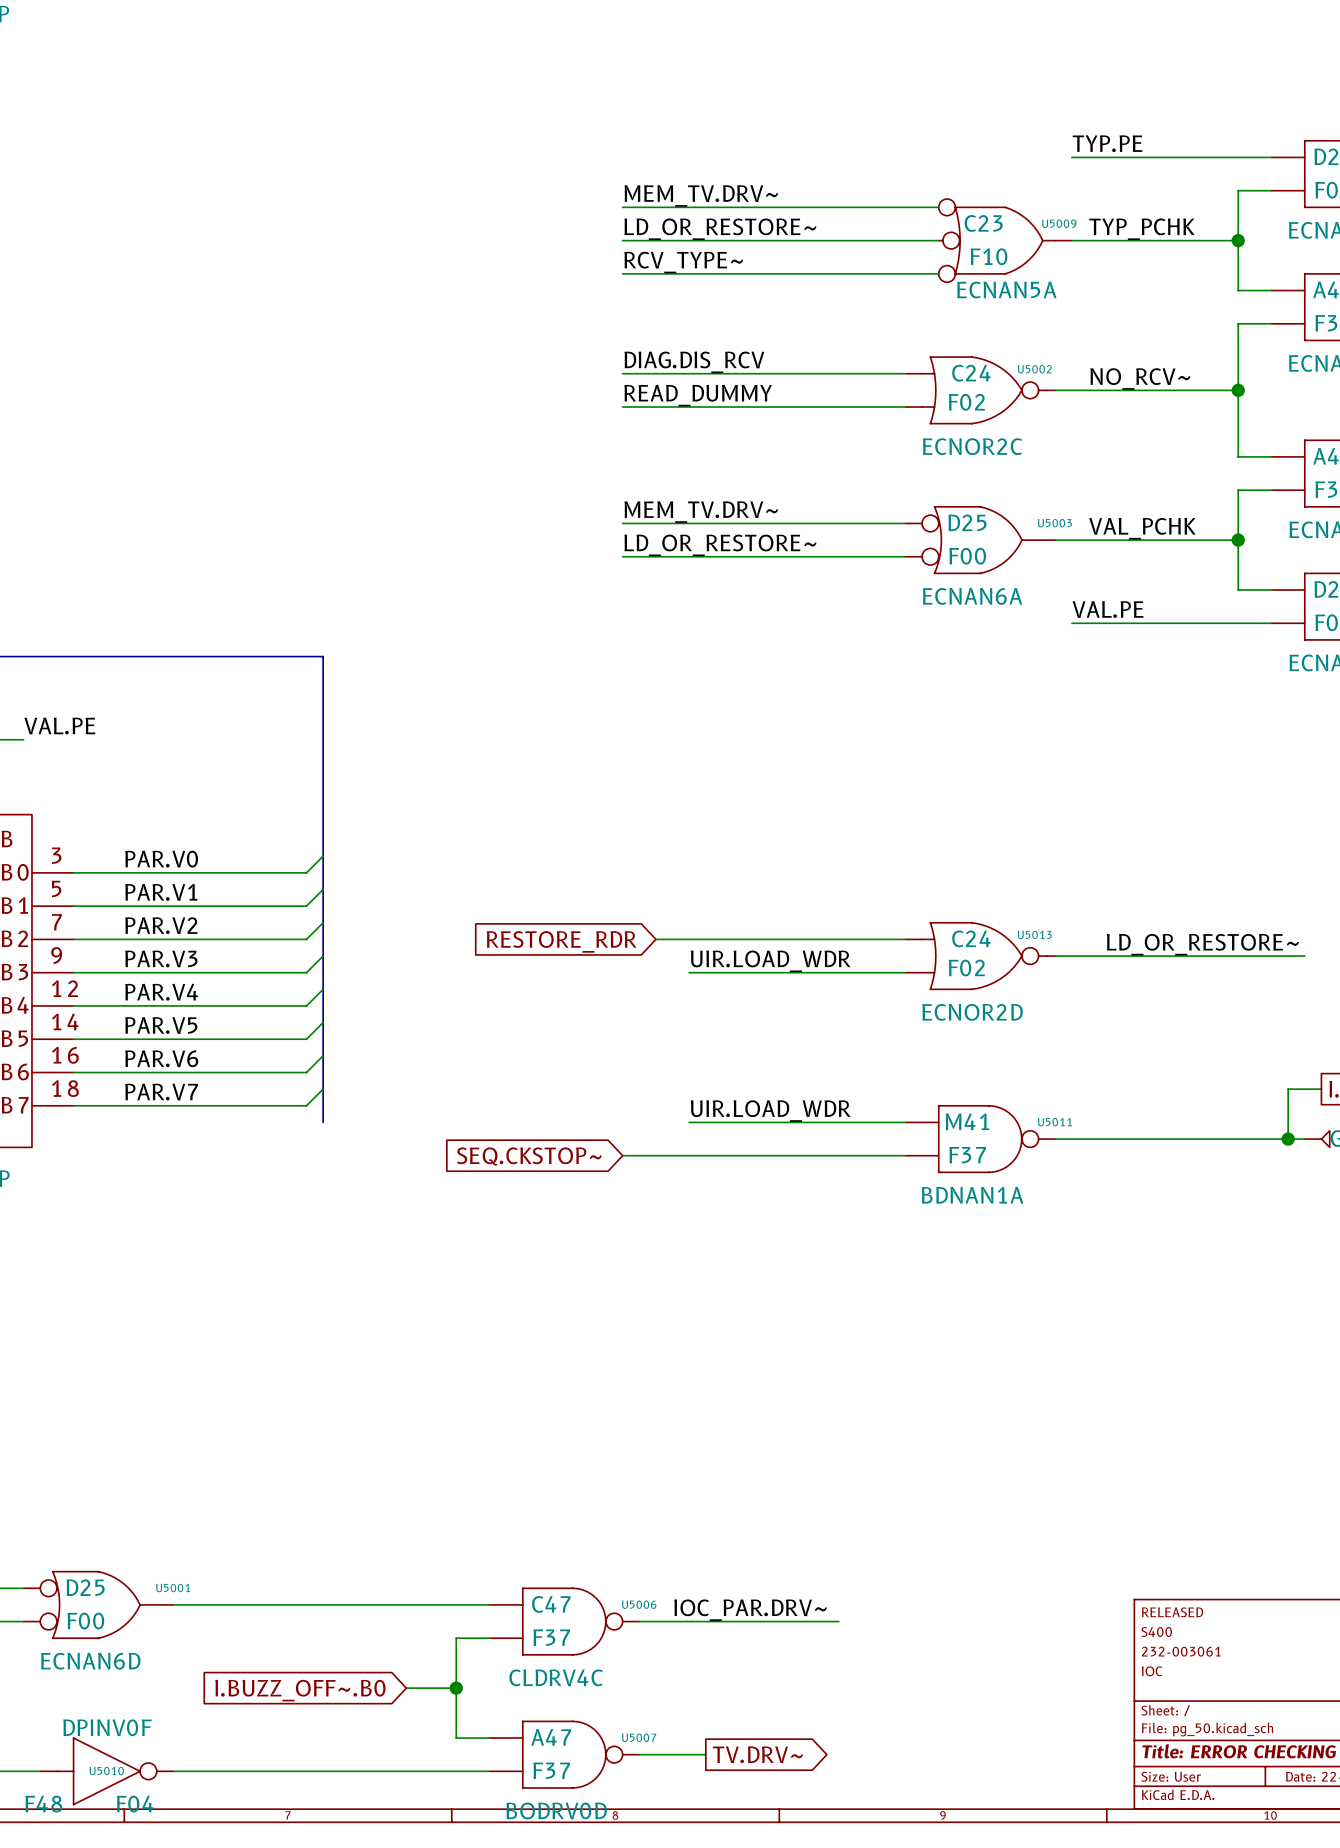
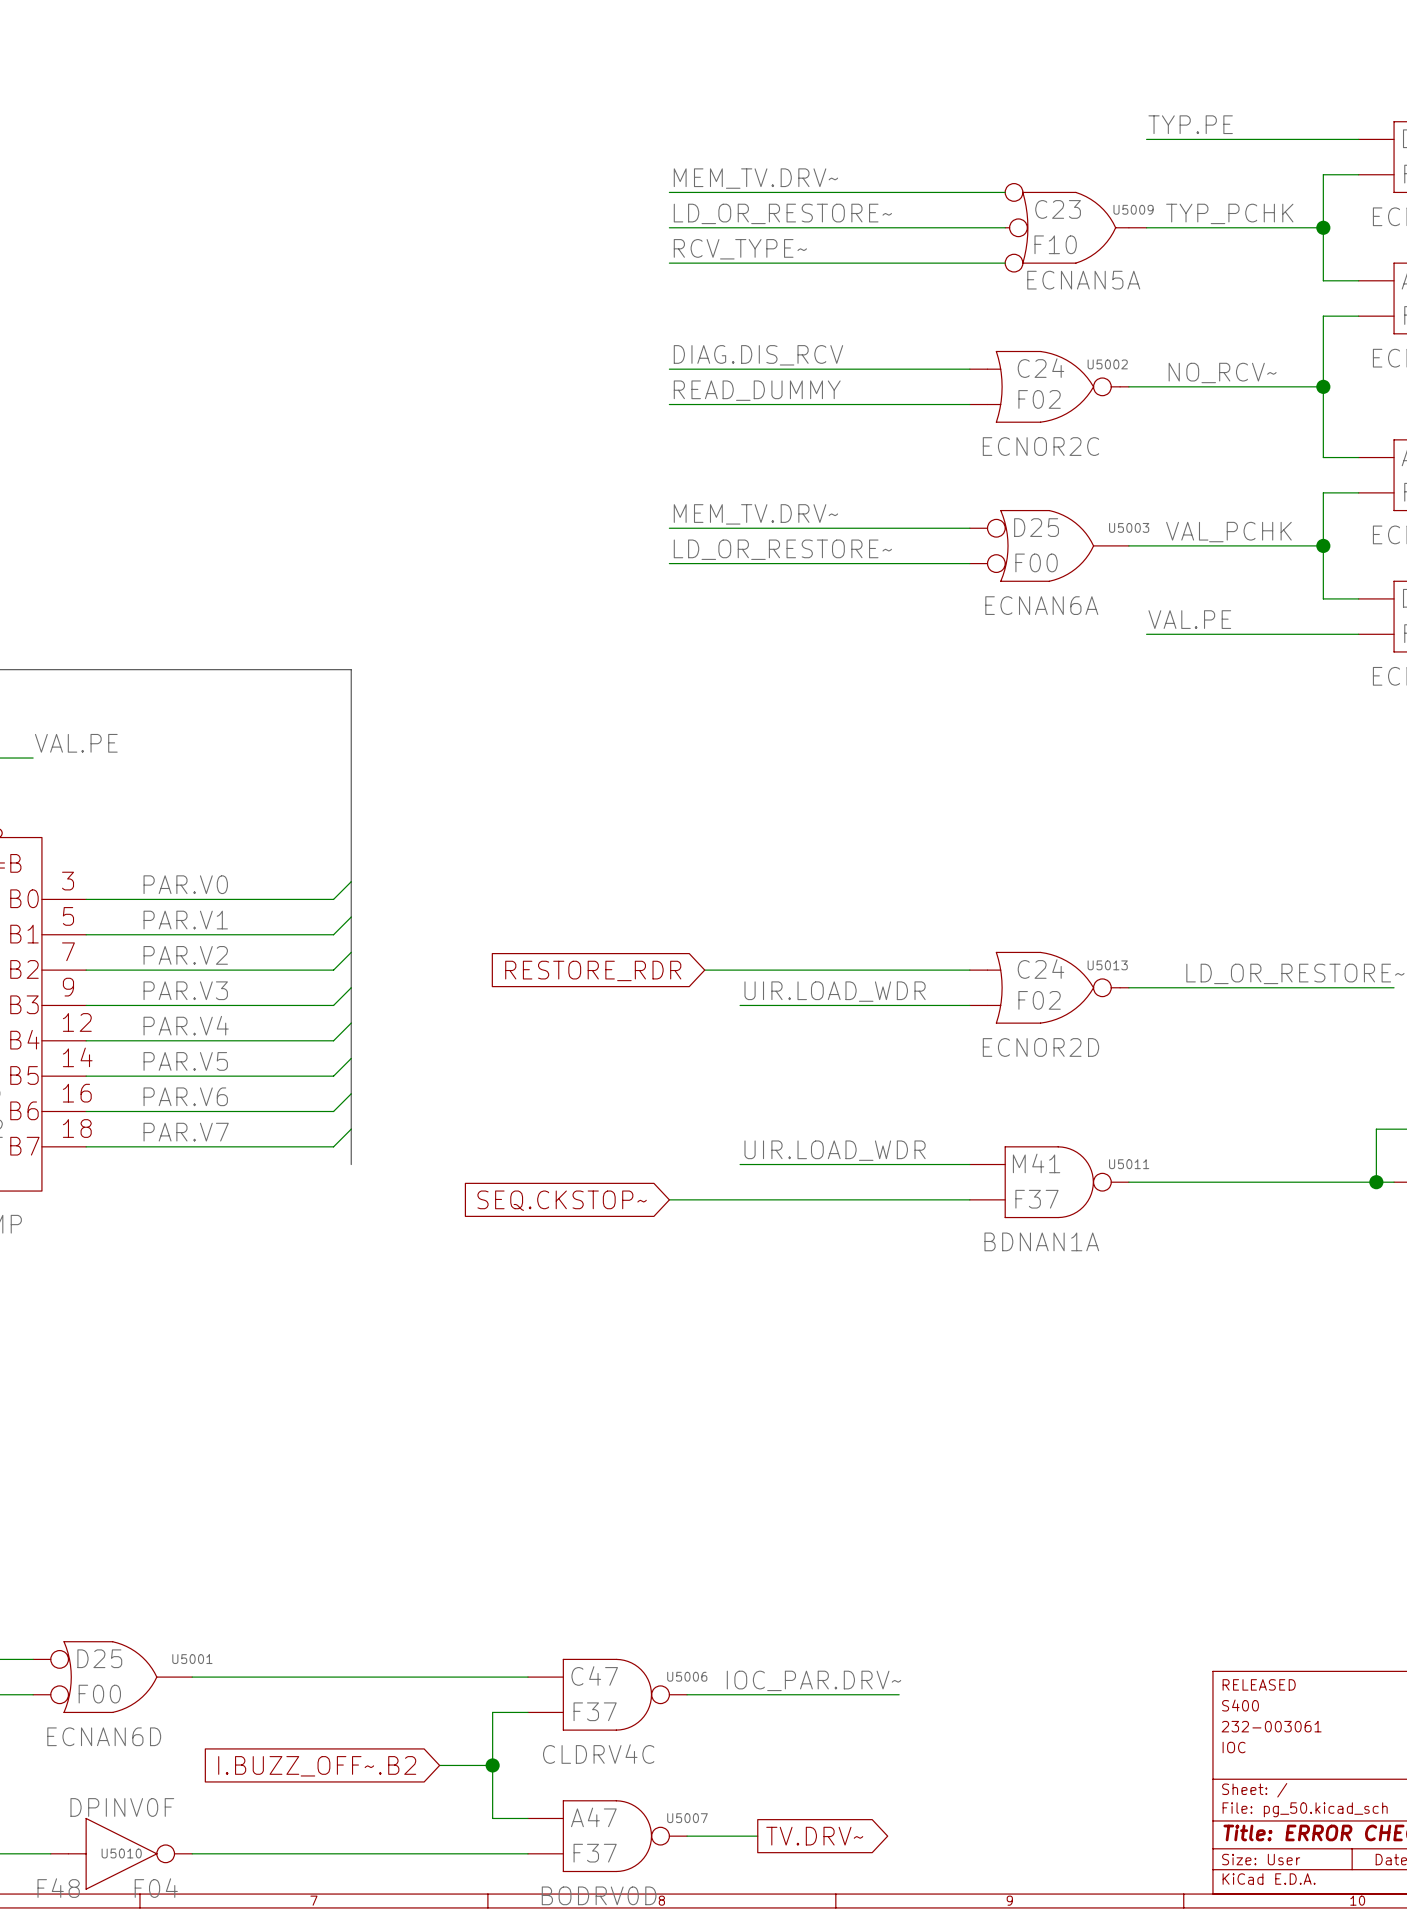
global label: I.BUZZ_OFF~.B0 (300, 1690) -> I.BUZZ_OFF~.B2 (317, 1766)

